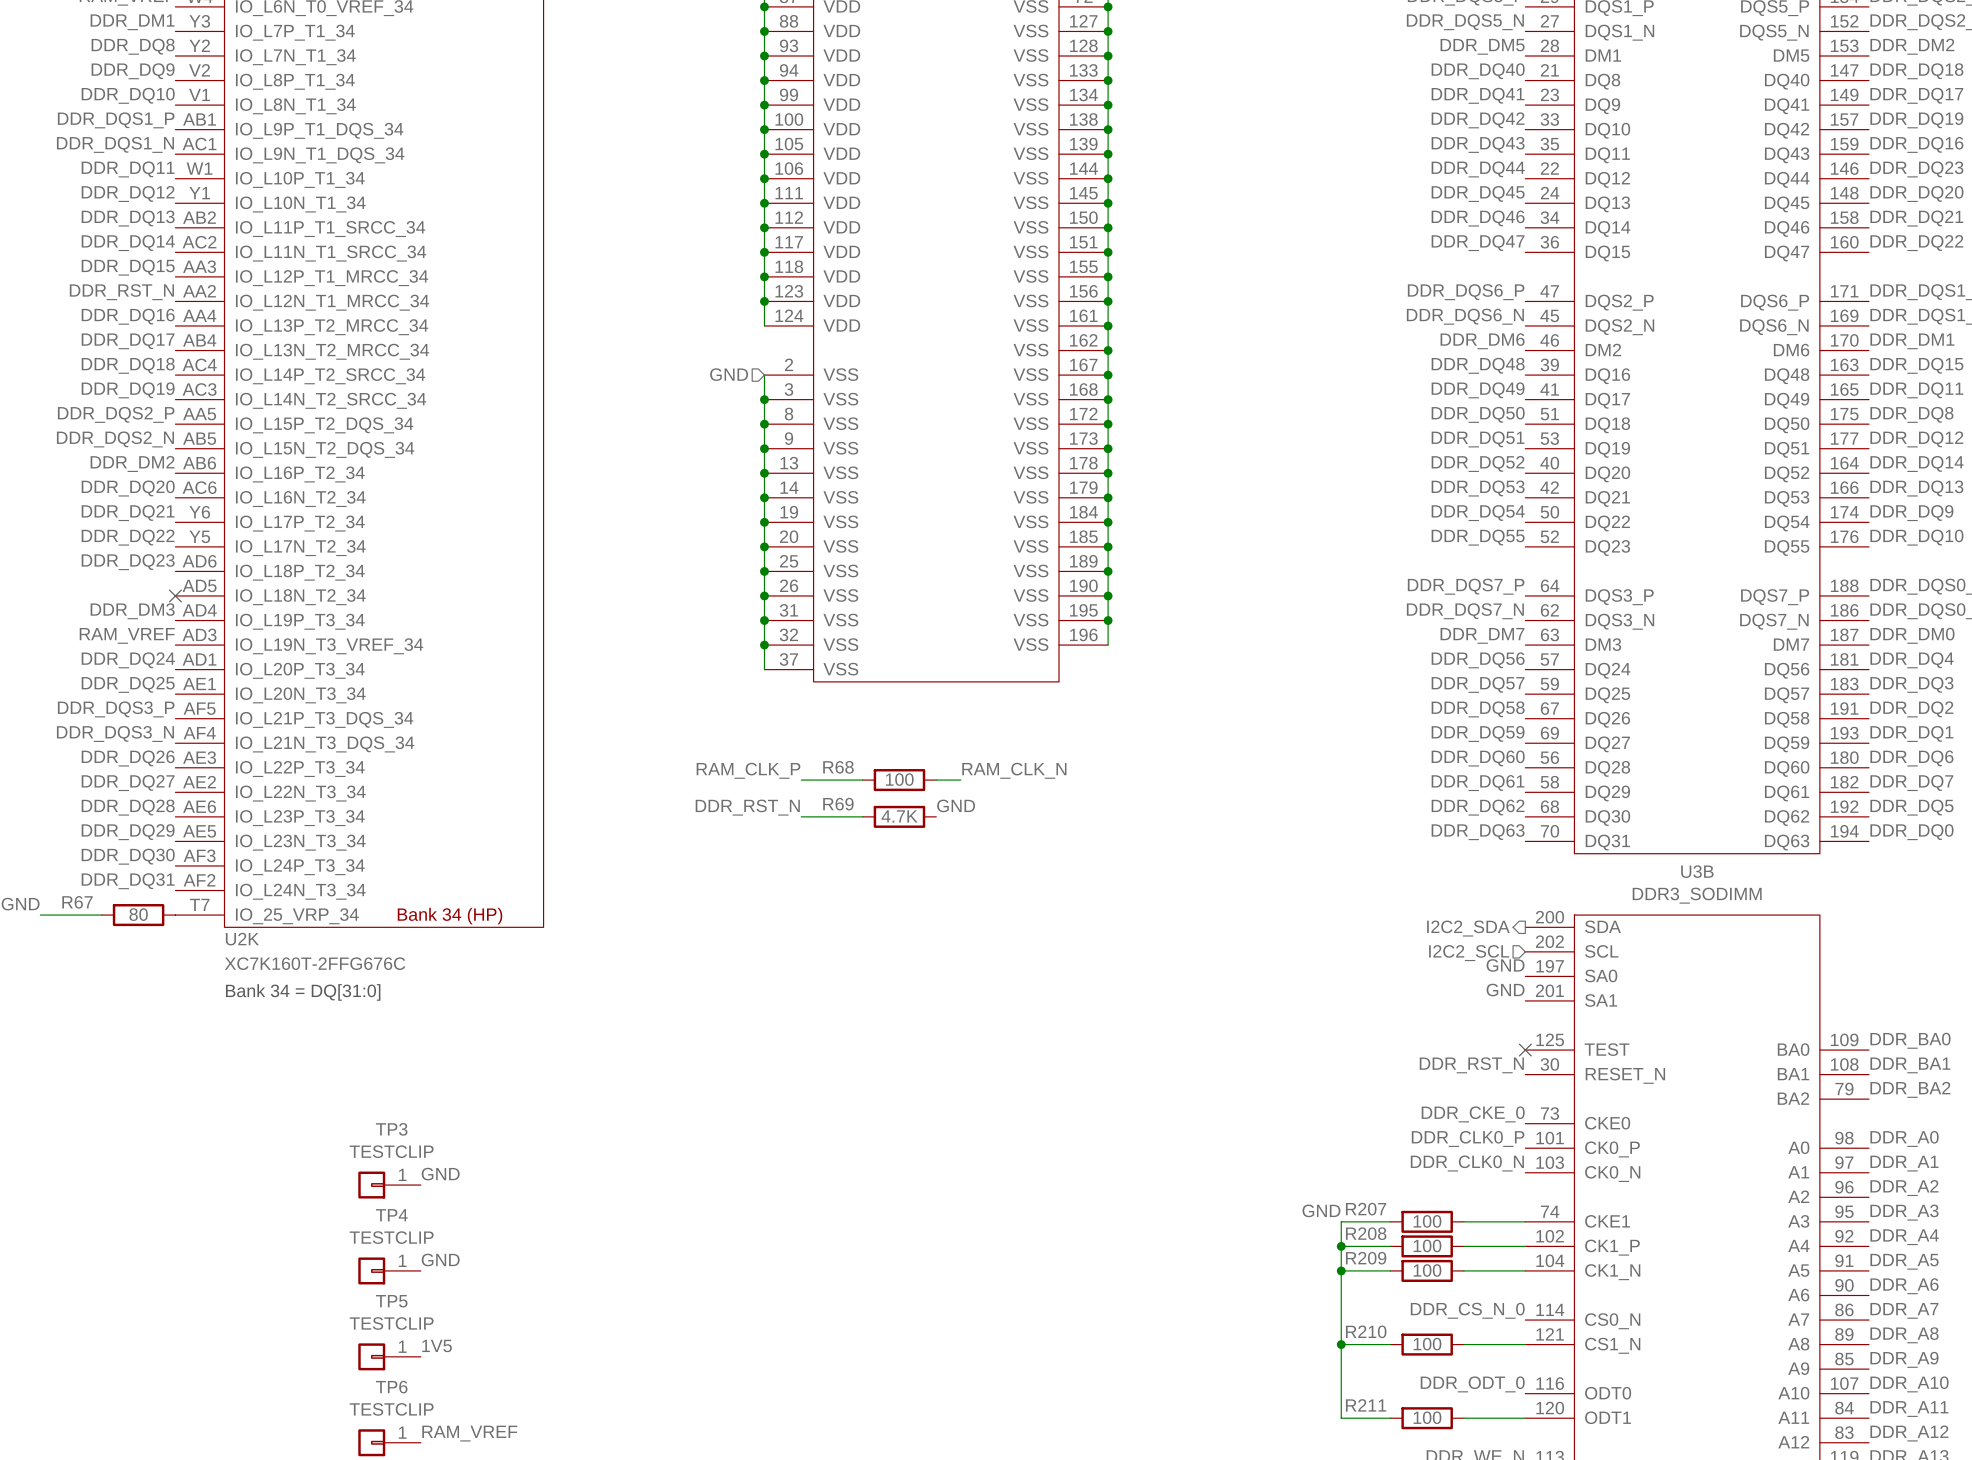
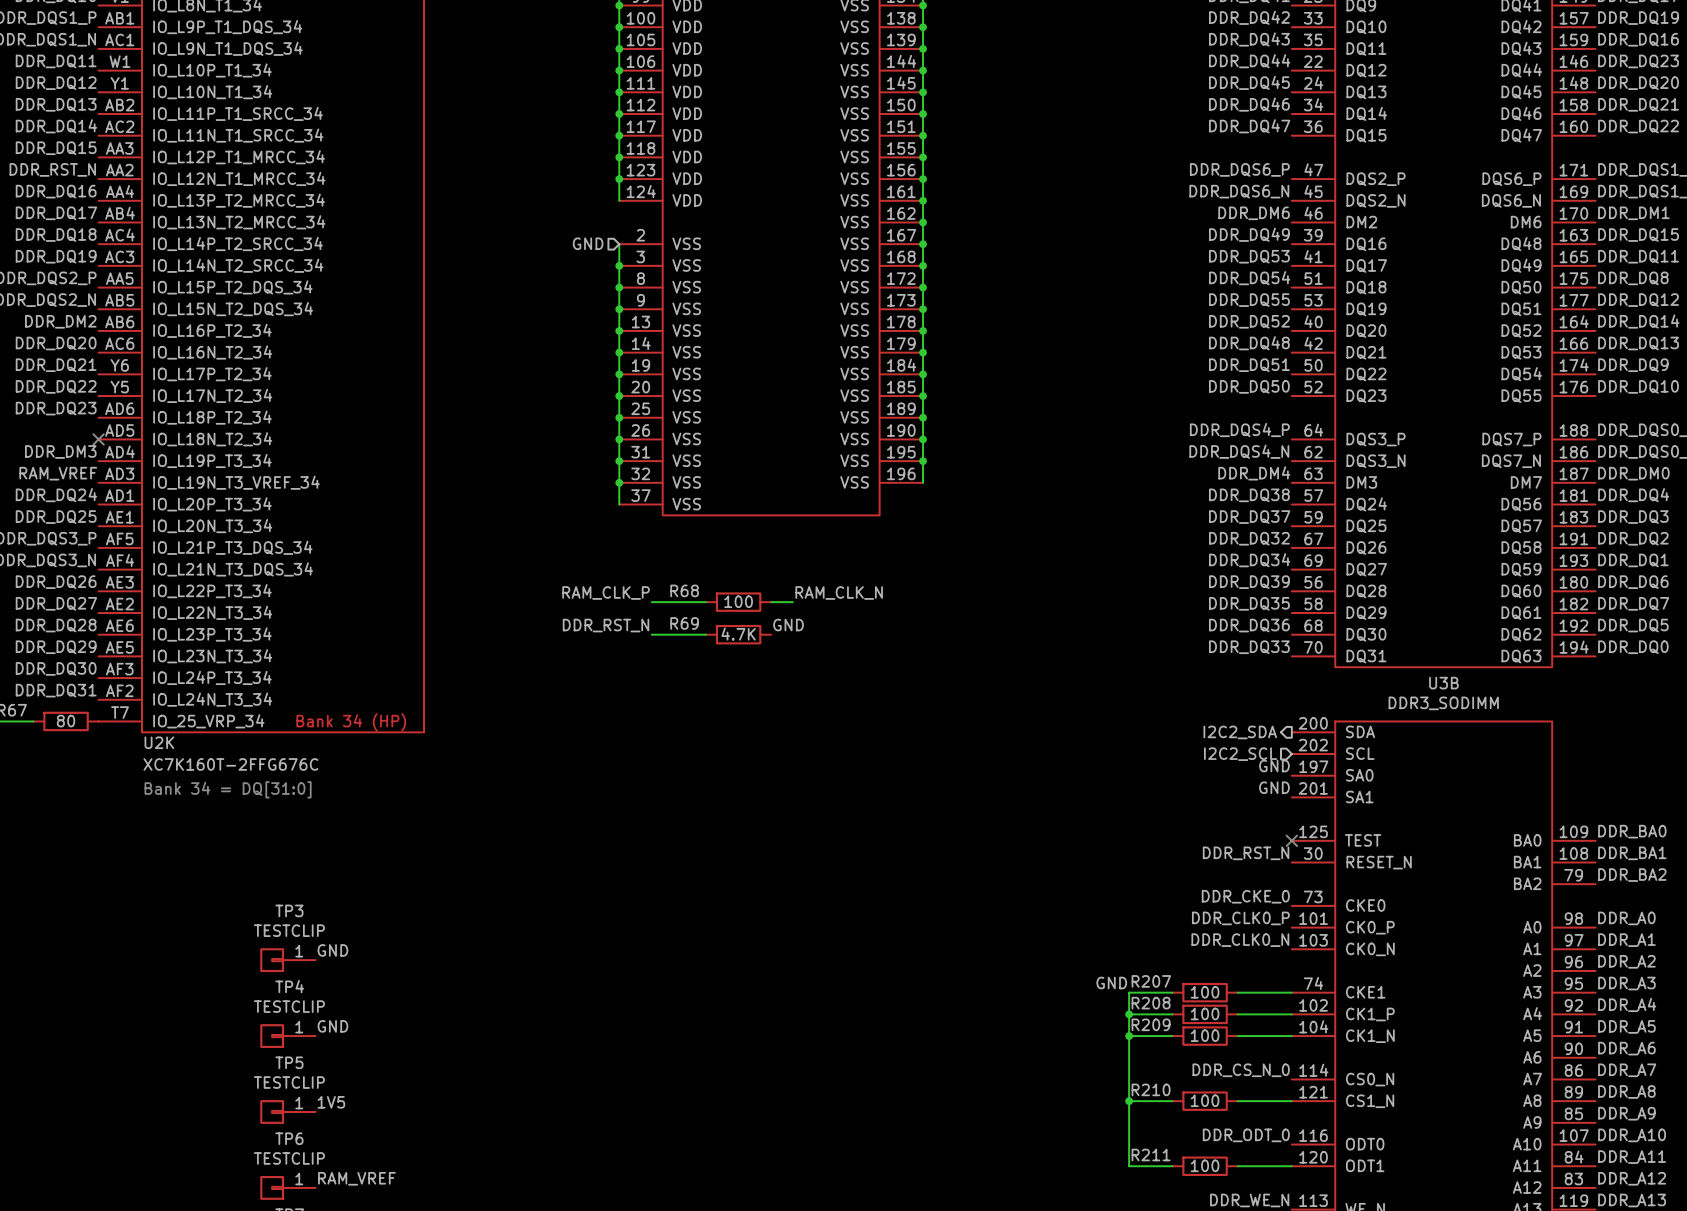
label: DDR_DQ48 (1478, 365) -> DDR_DQ49 (1249, 234)
label: DDR_DQ49 (1478, 390) -> DDR_DQ53 (1249, 256)
label: DDR_DQ50 (1478, 414) -> DDR_DQ54 (1249, 278)
label: DDR_DQ51 (1478, 439) -> DDR_DQ55 (1249, 300)
label: DDR_DQ53 (1478, 488) -> DDR_DQ48 (1249, 343)
label: DDR_DQ54 (1478, 513) -> DDR_DQ51 (1249, 365)
label: DDR_DQ55 (1478, 537) -> DDR_DQ50 (1249, 386)
label: DDR_DQS7_P (1466, 586) -> DDR_DQS4_P (1239, 430)
label: DDR_DQS7_N (1465, 611) -> DDR_DQS4_N (1239, 451)
label: DDR_DM7 (1482, 635) -> DDR_DM4 (1254, 473)
label: DDR_DQ56 (1478, 660) -> DDR_DQ38 (1249, 495)
label: DDR_DQ57 (1478, 684) -> DDR_DQ37 (1249, 517)
label: DDR_DQ58 (1478, 709) -> DDR_DQ32 (1249, 538)
label: DDR_DQ59 (1478, 733) -> DDR_DQ34 (1249, 560)
label: DDR_DQ60 (1478, 758) -> DDR_DQ39 (1249, 582)
label: DDR_DQ61 (1478, 783) -> DDR_DQ35 (1249, 603)
label: DDR_DQ62 (1478, 807) -> DDR_DQ36 (1249, 625)
label: DDR_DQ63 (1478, 832) -> DDR_DQ33 (1249, 647)

